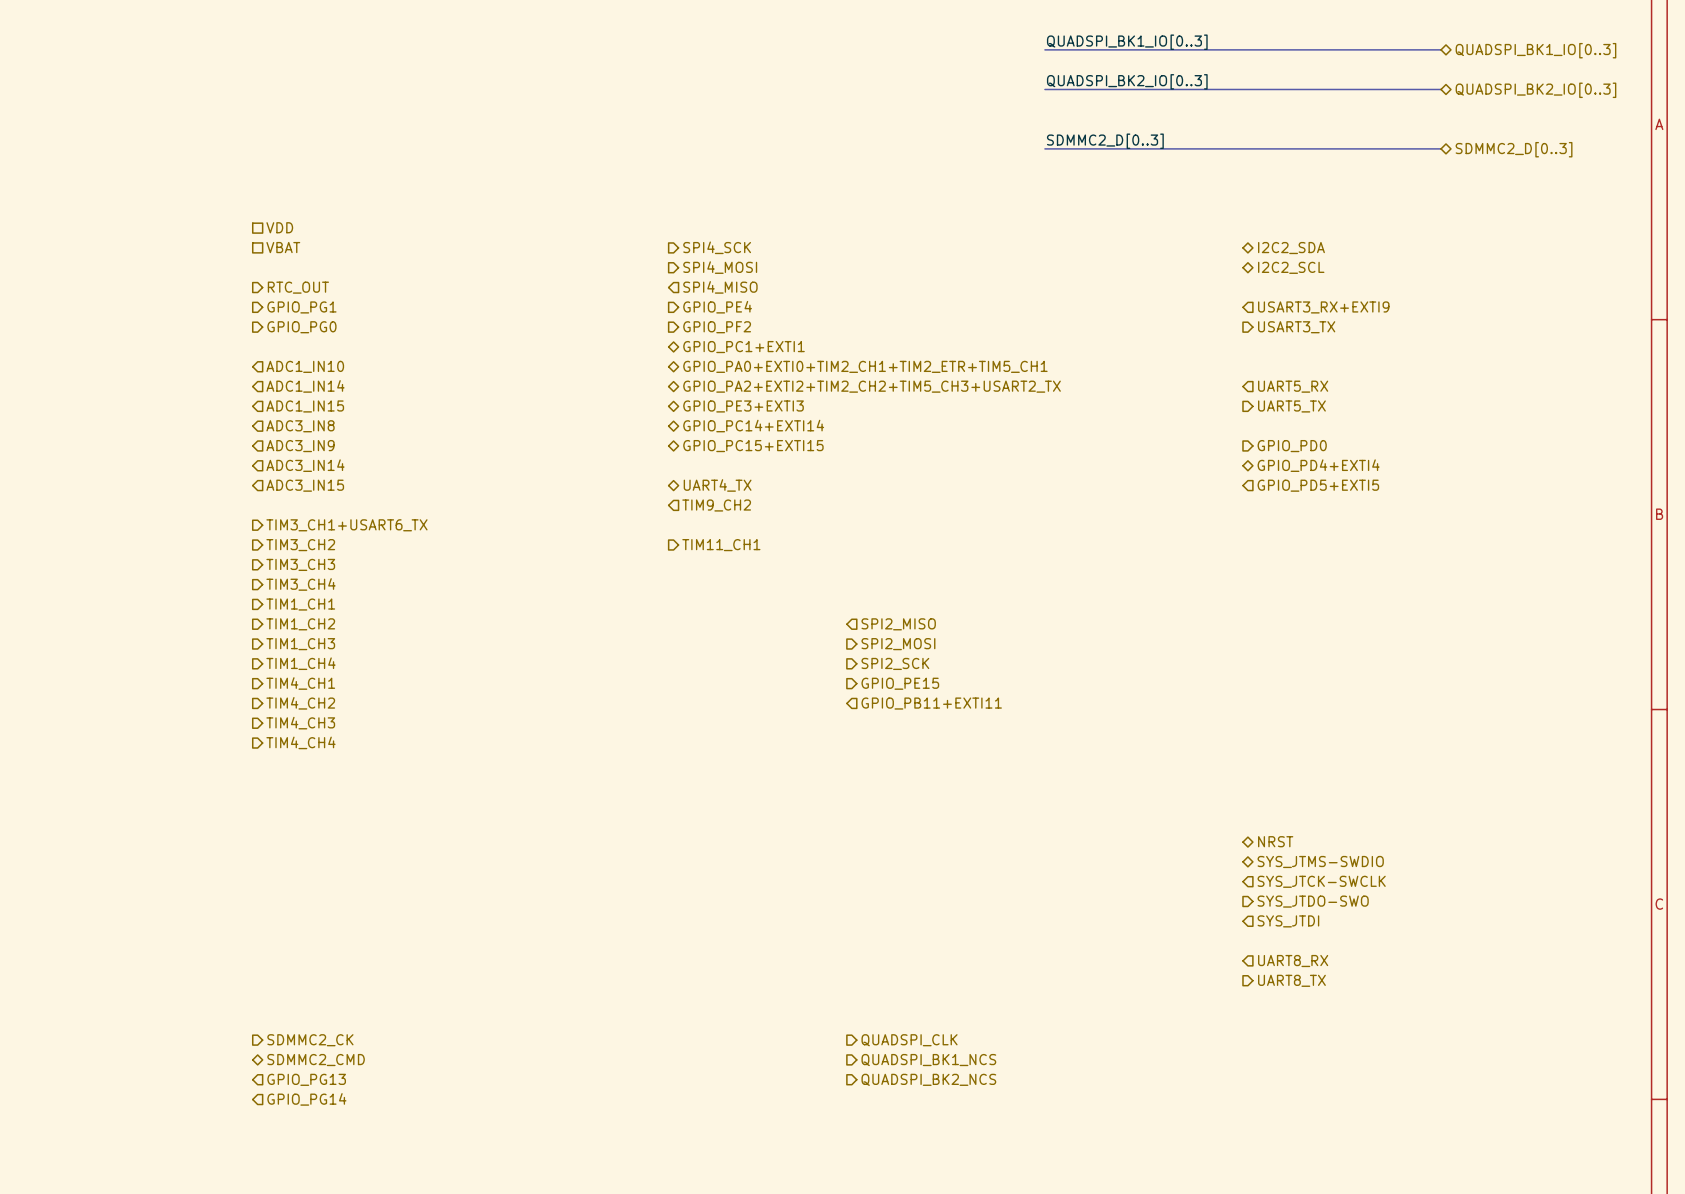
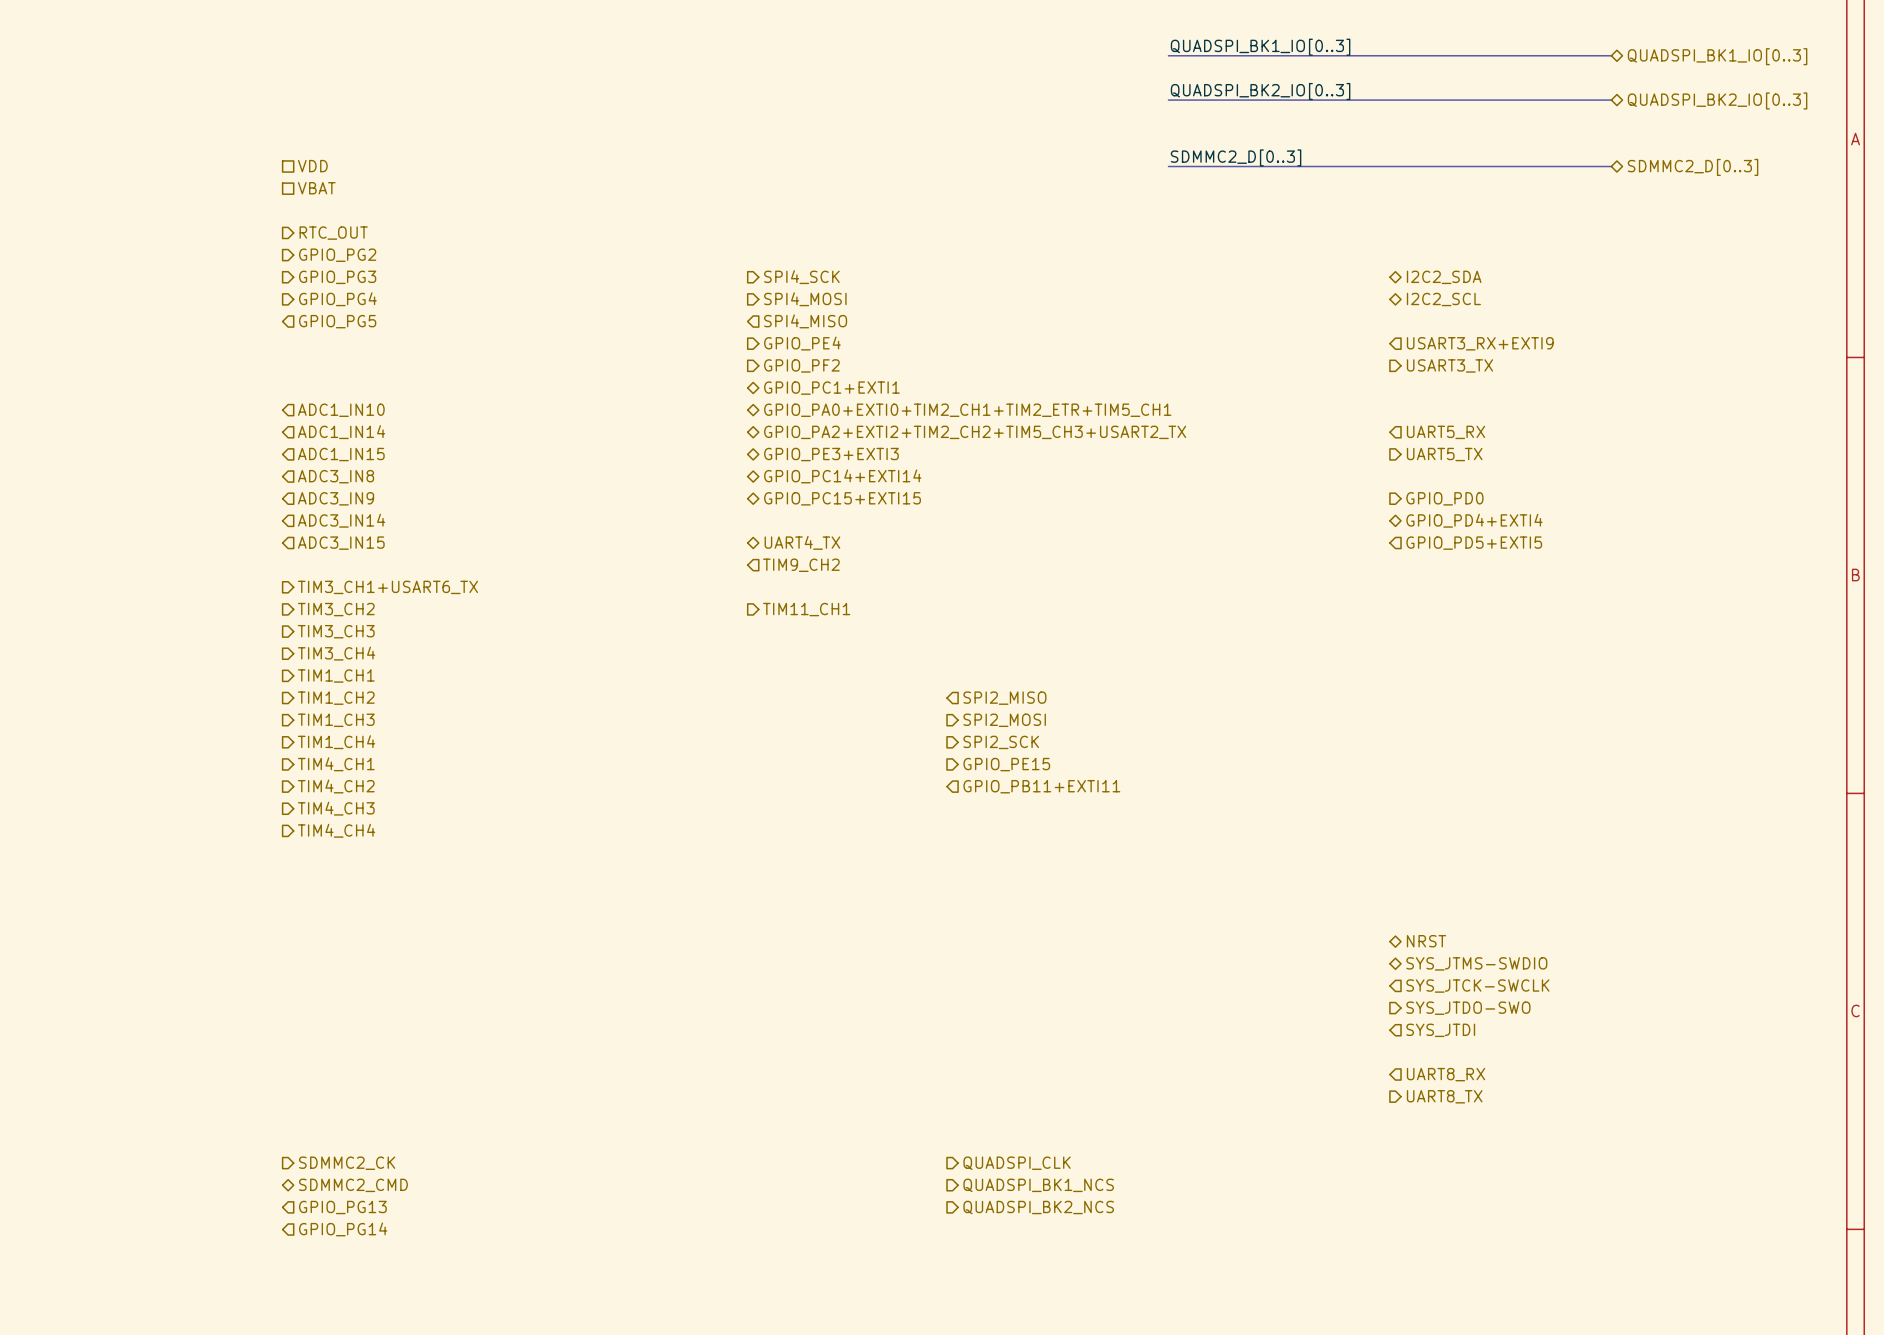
hierarchical label: none -> VDD (312, 166)
hierarchical label: none -> VBAT (316, 188)
hierarchical label: none -> RTC_OUT (333, 233)
hierarchical label shape: passive (279, 227) -> output (337, 255)
hierarchical label: VDD (279, 227) -> GPIO_PG2 (337, 255)
hierarchical label shape: passive (283, 247) -> output (337, 277)
hierarchical label: VBAT (283, 247) -> GPIO_PG3 (337, 277)
hierarchical label: none -> GPIO_PG4 (337, 299)
hierarchical label shape: output (298, 287) -> input (337, 321)
hierarchical label: RTC_OUT (298, 287) -> GPIO_PG5 (337, 321)
hierarchical label: GPIO_PG1 (301, 307) -> none
hierarchical label: GPIO_PG0 (301, 327) -> none

